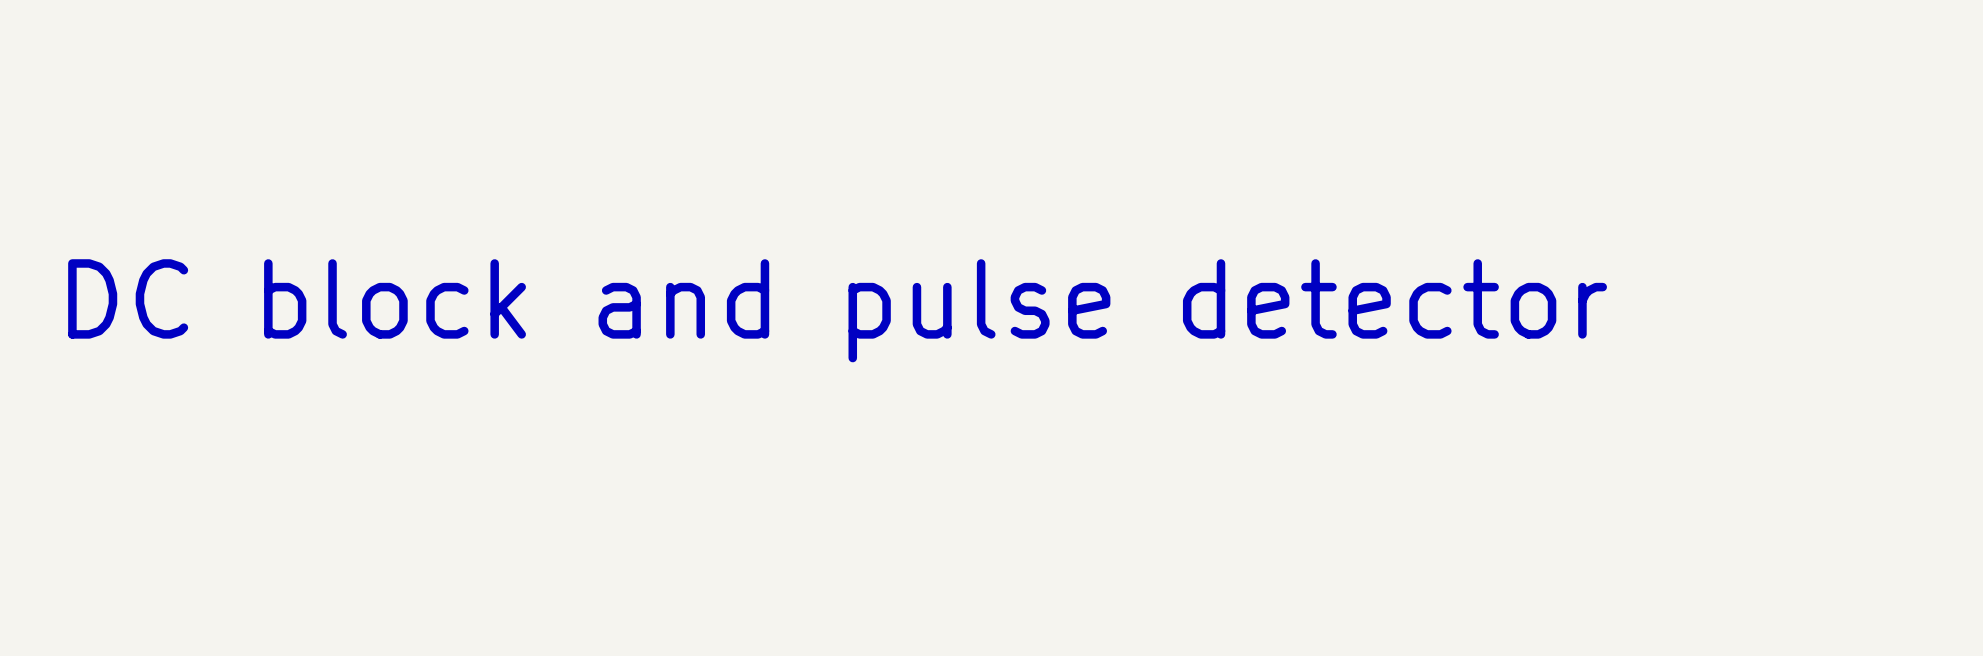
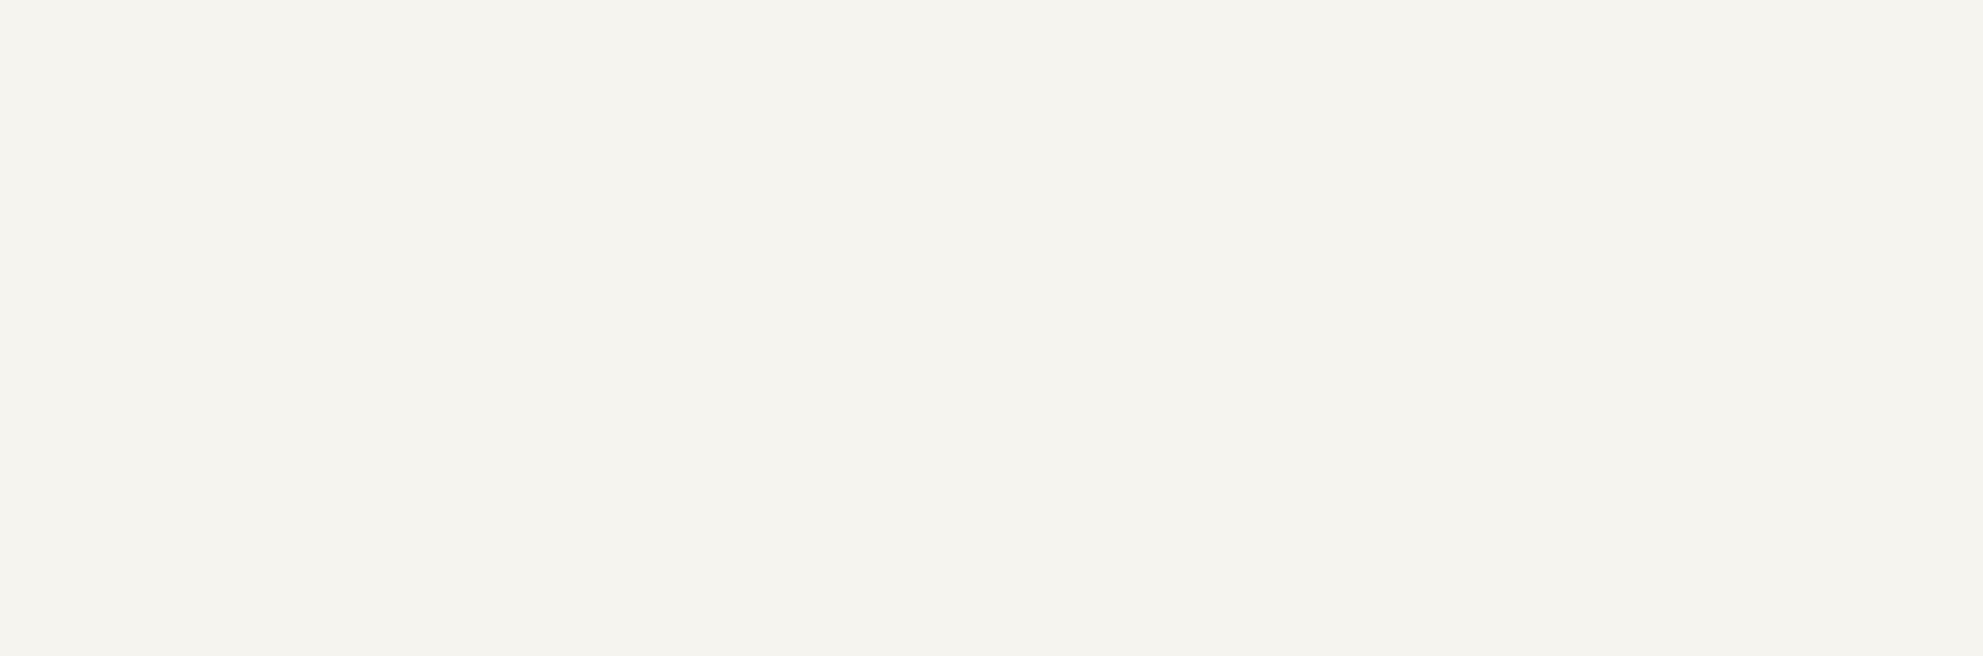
text: DC block and pulse detector (837, 310) -> none

